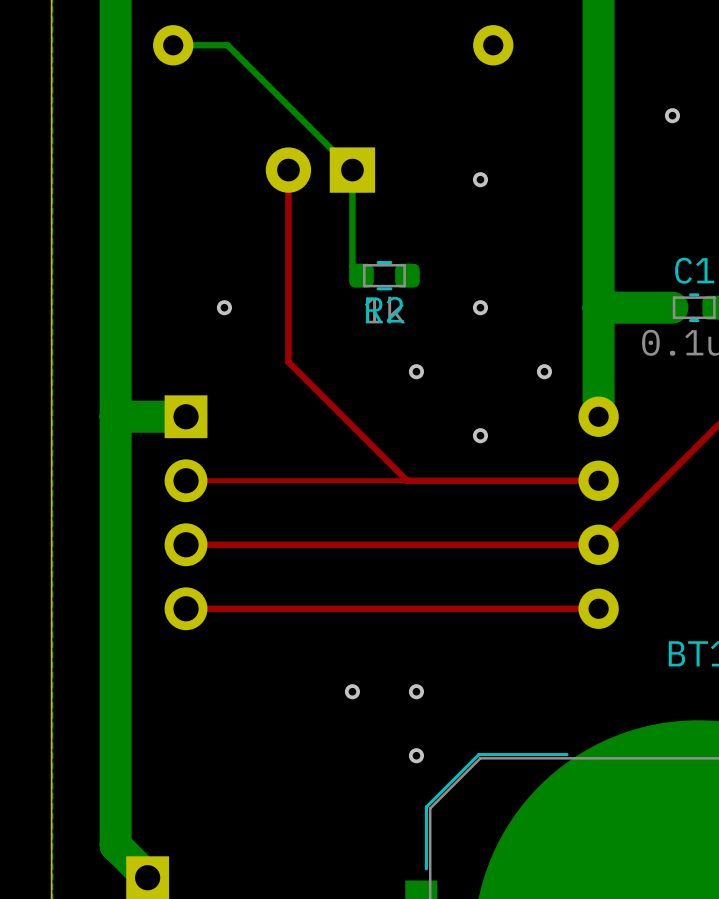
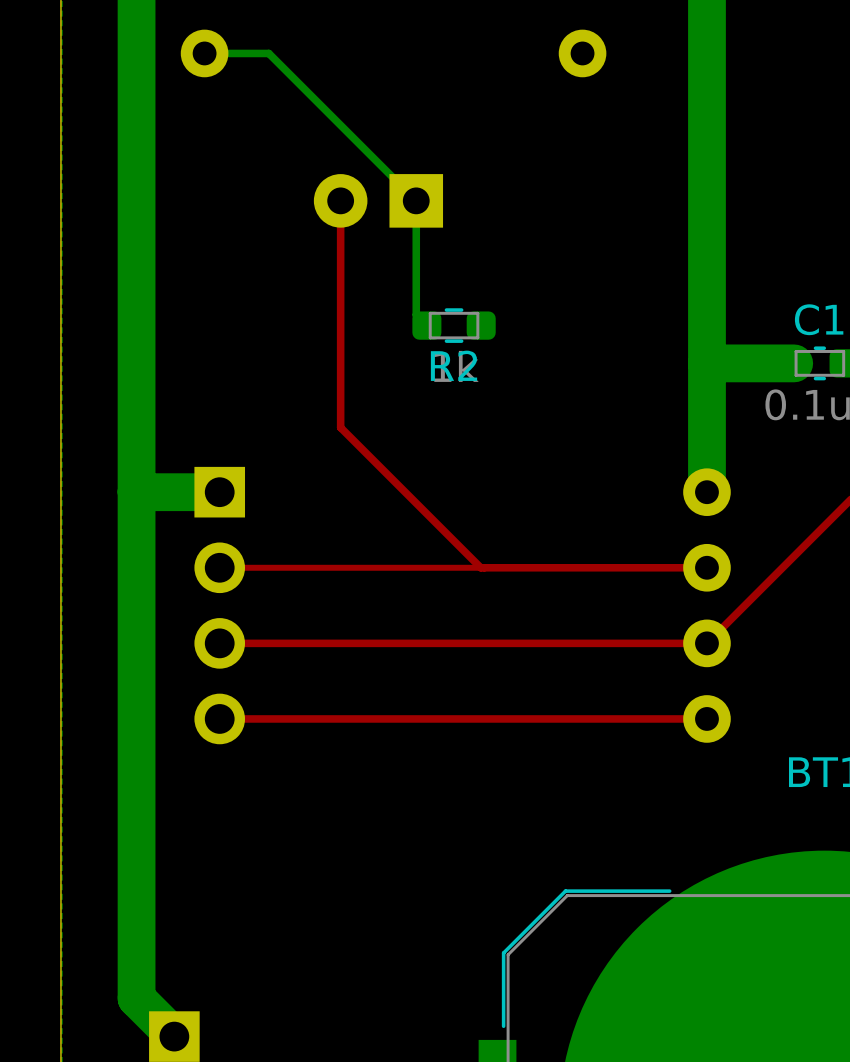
via: (672, 115) -> none
via: (480, 179) -> none
via: (224, 307) -> none
via: (480, 307) -> none
via: (416, 371) -> none
via: (544, 371) -> none
via: (480, 435) -> none
via: (352, 691) -> none
via: (416, 691) -> none
via: (416, 755) -> none

